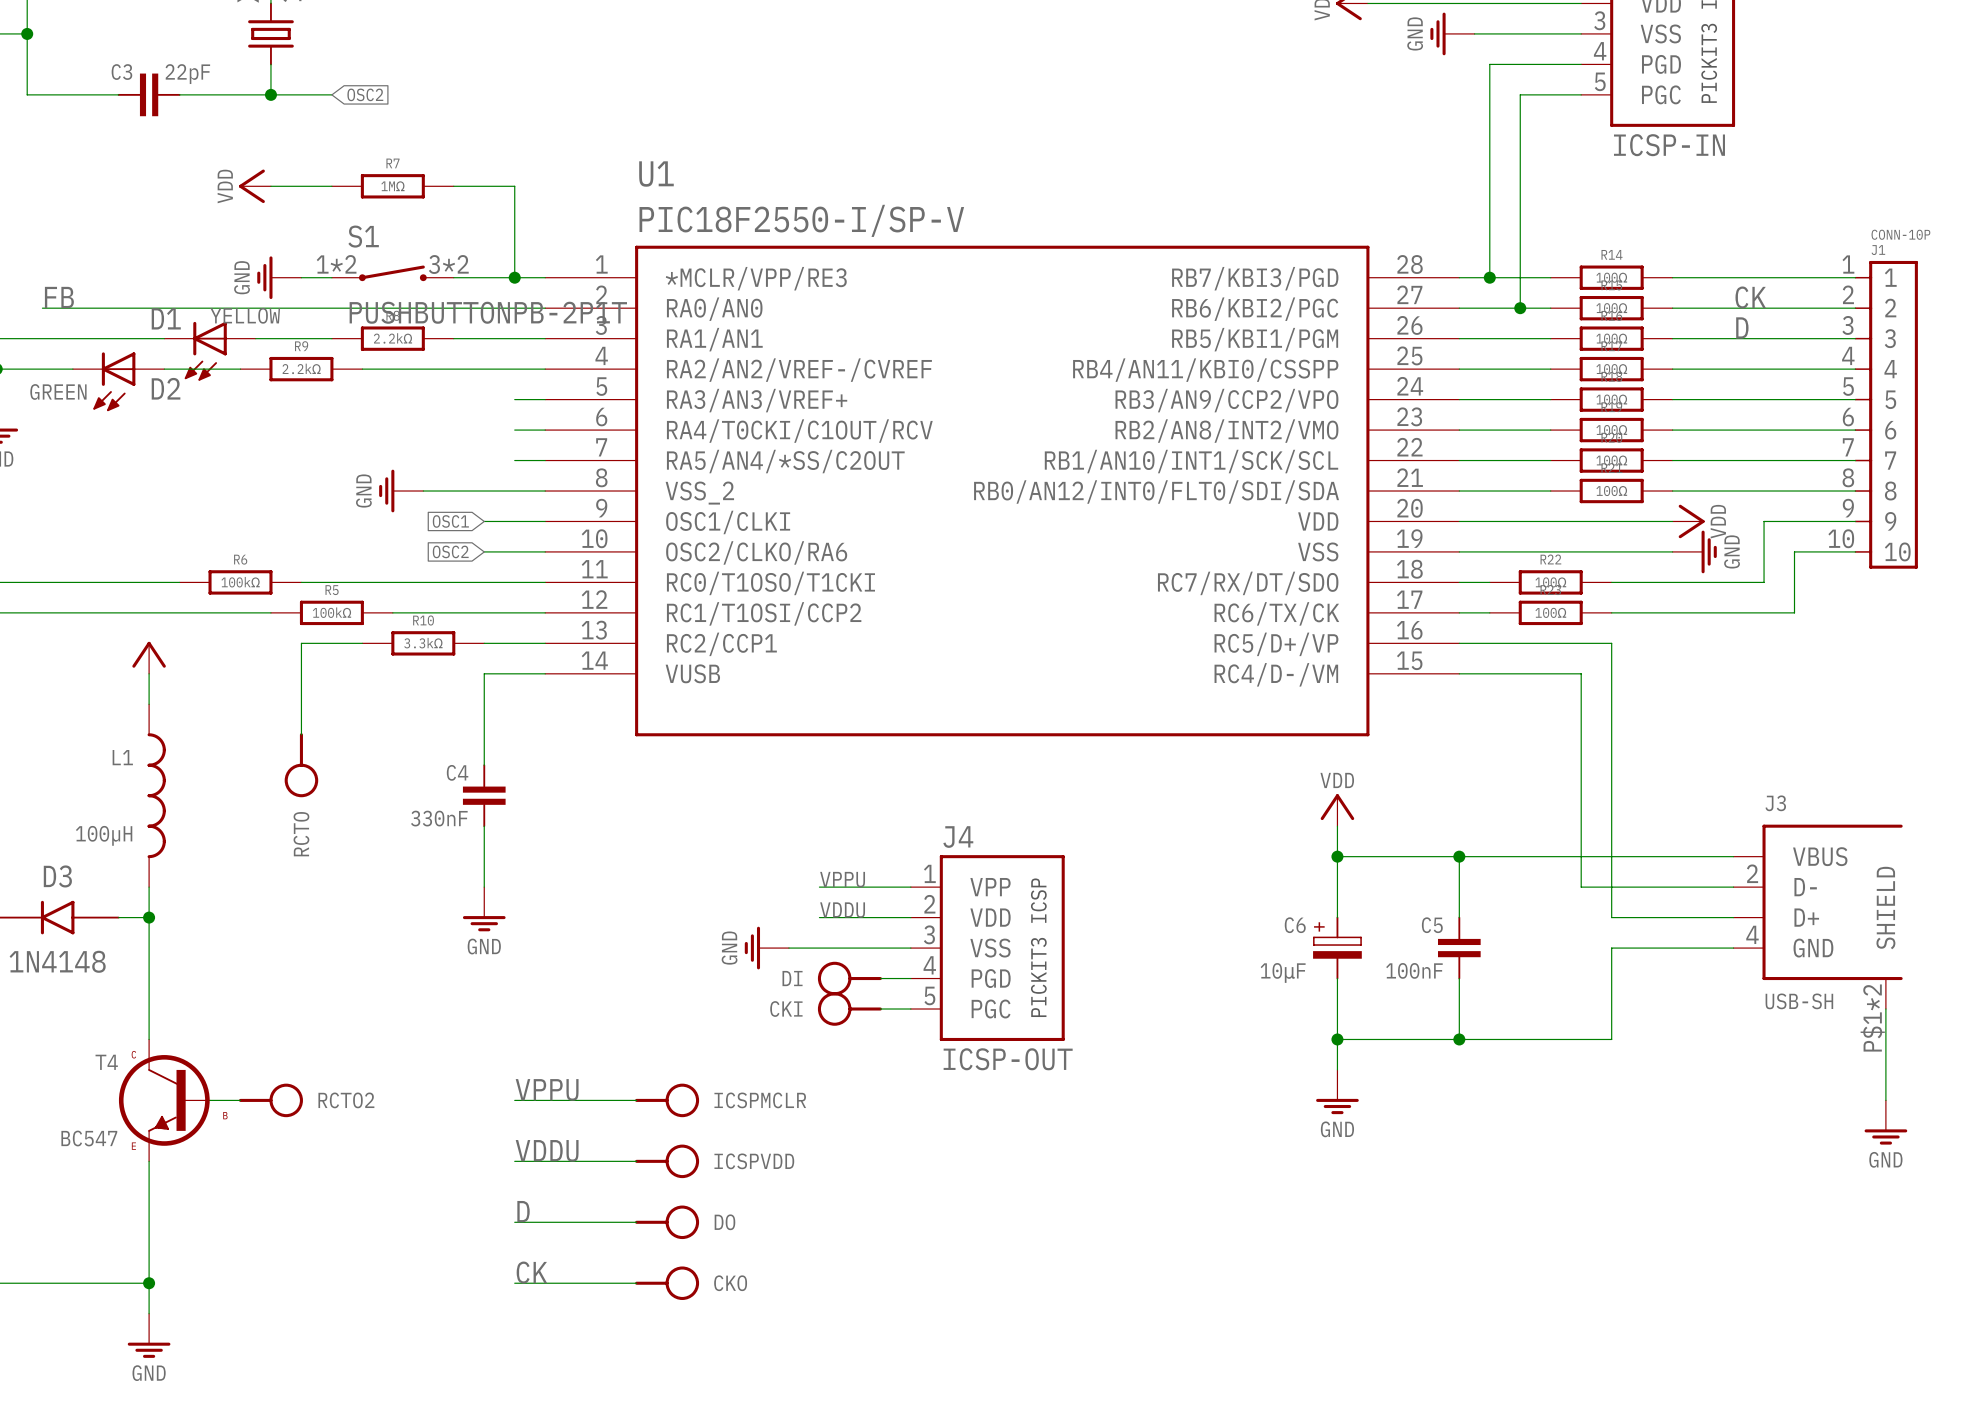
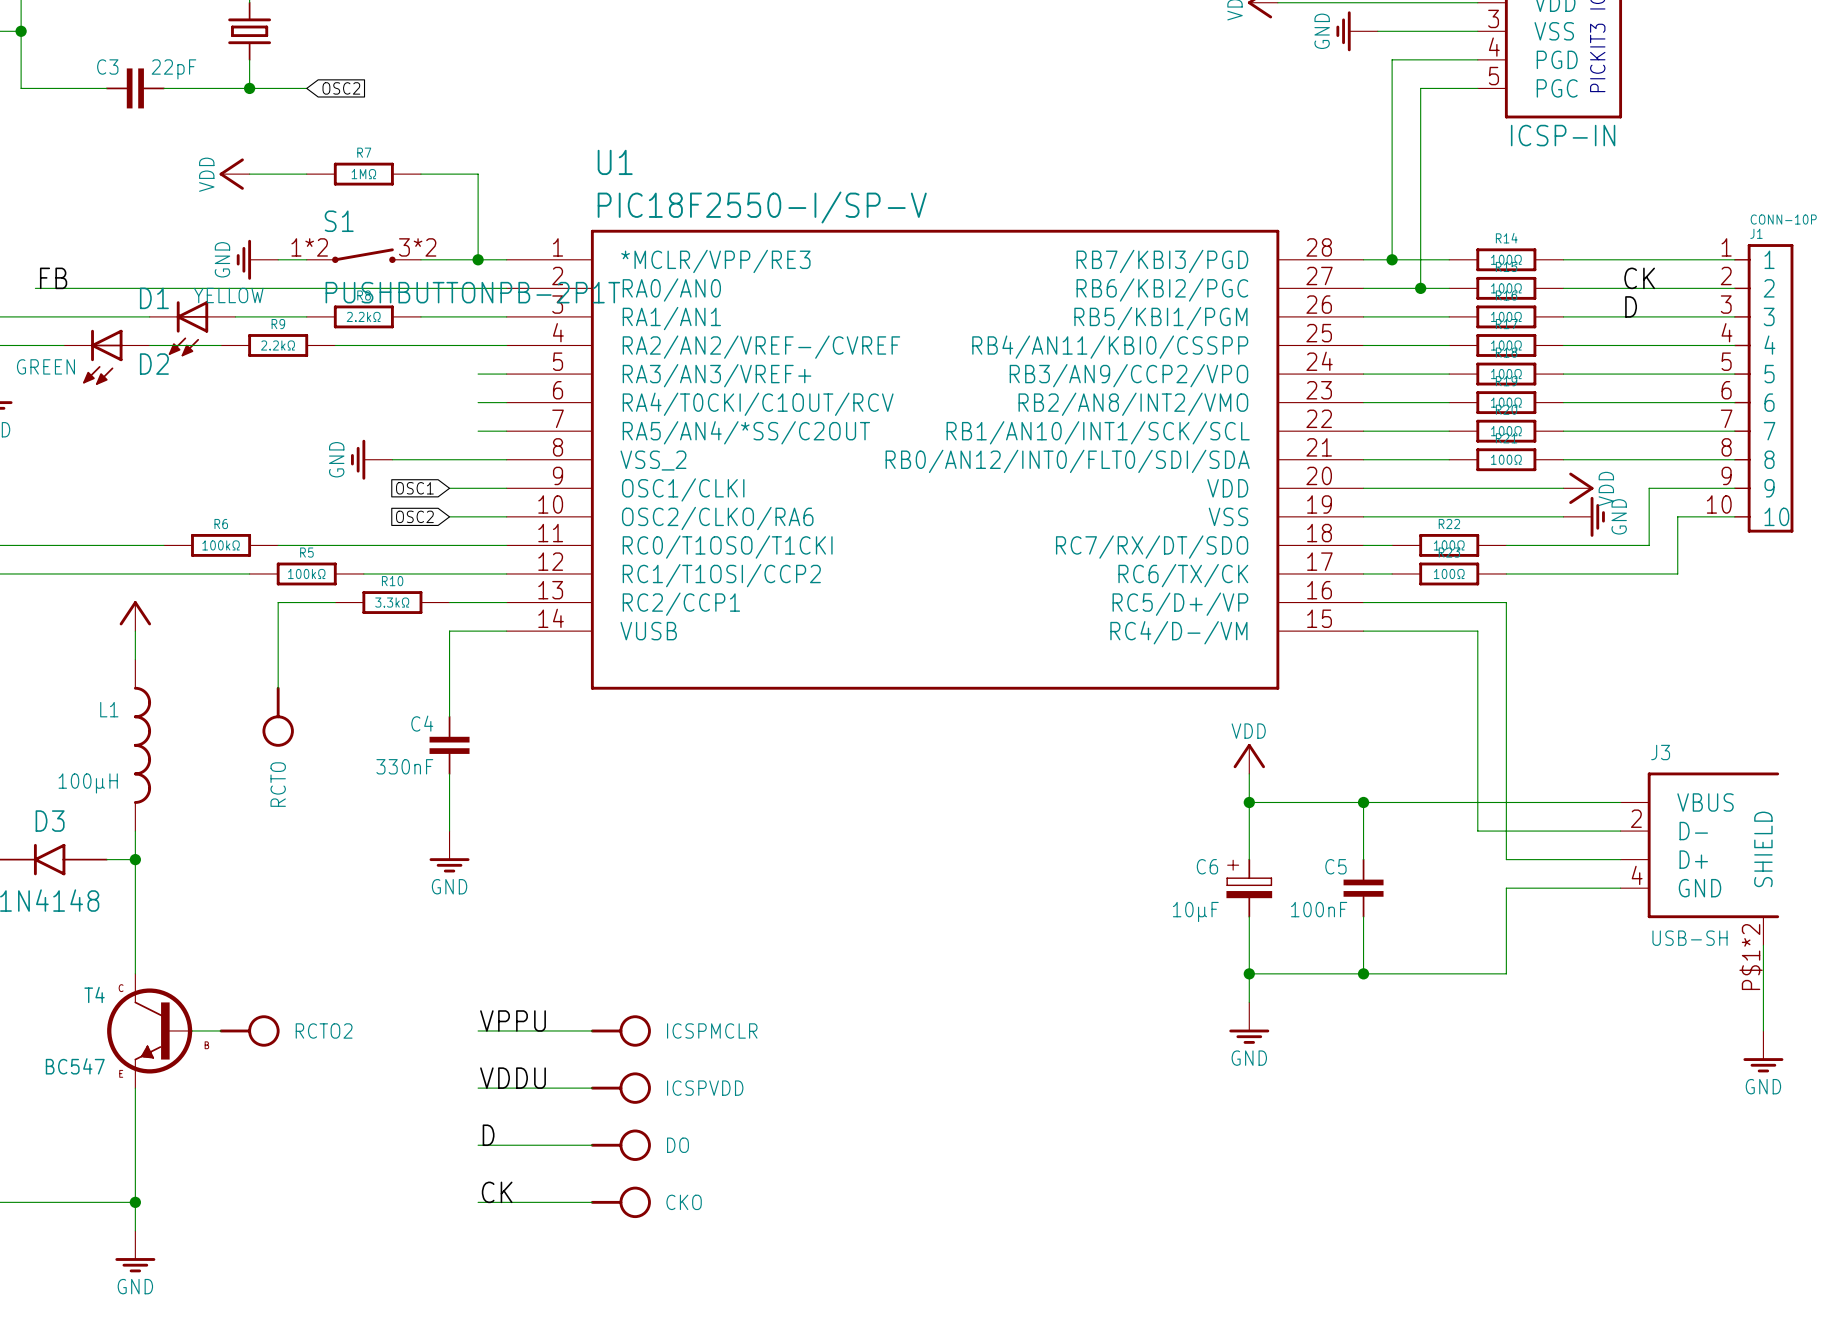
label: VPPU (842, 879) -> none
wire: (819, 887) (910, 887) -> none
label: VDDU (842, 910) -> none
wire: (819, 917) (910, 917) -> none
power symbol: GND (766, 948) -> none
wire: (788, 948) (910, 948) -> none
J4: ICSP-OUT (987, 948) -> none
DI: (849, 978) -> none
wire: (880, 978) (910, 978) -> none
CKI: (849, 1009) -> none
wire: (880, 1009) (910, 1009) -> none

